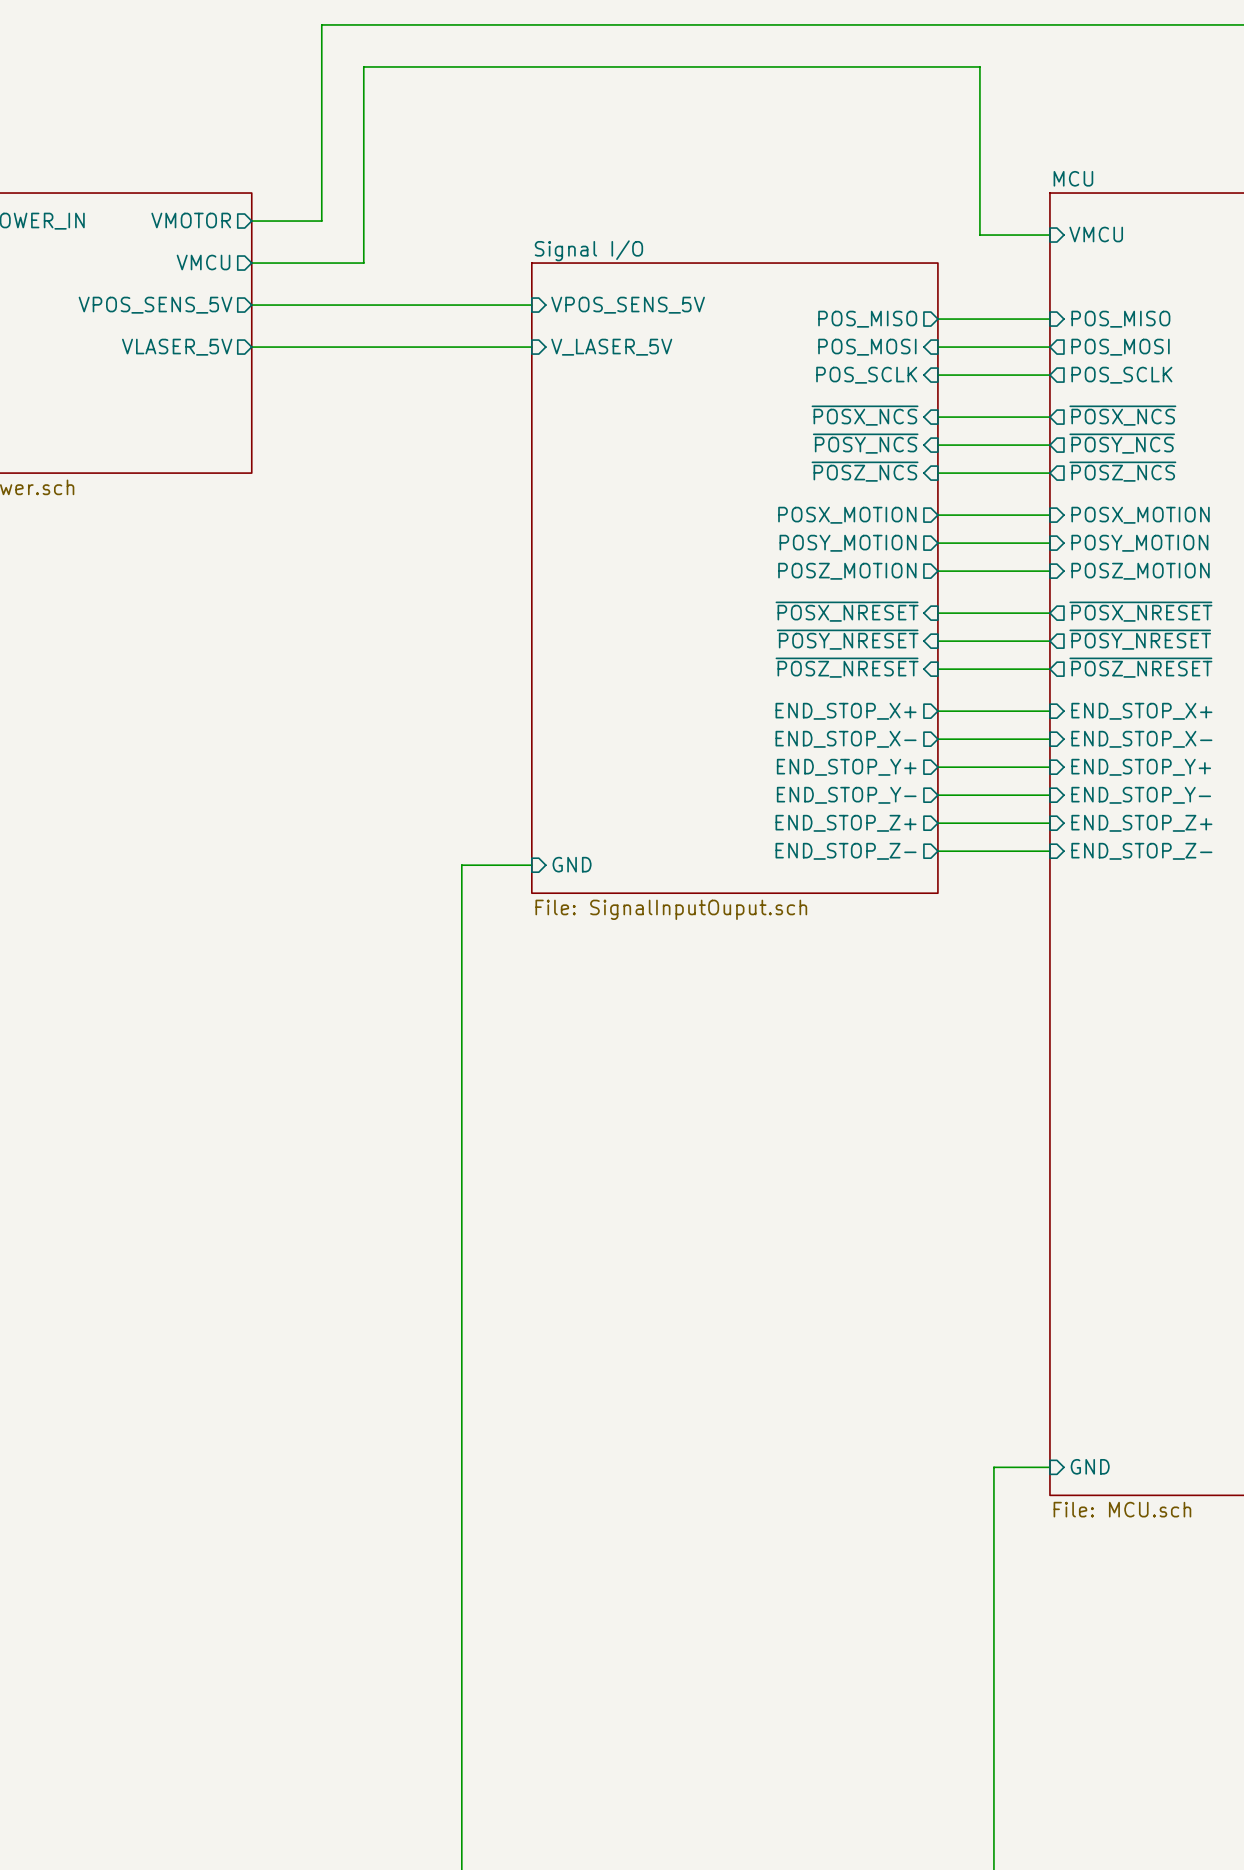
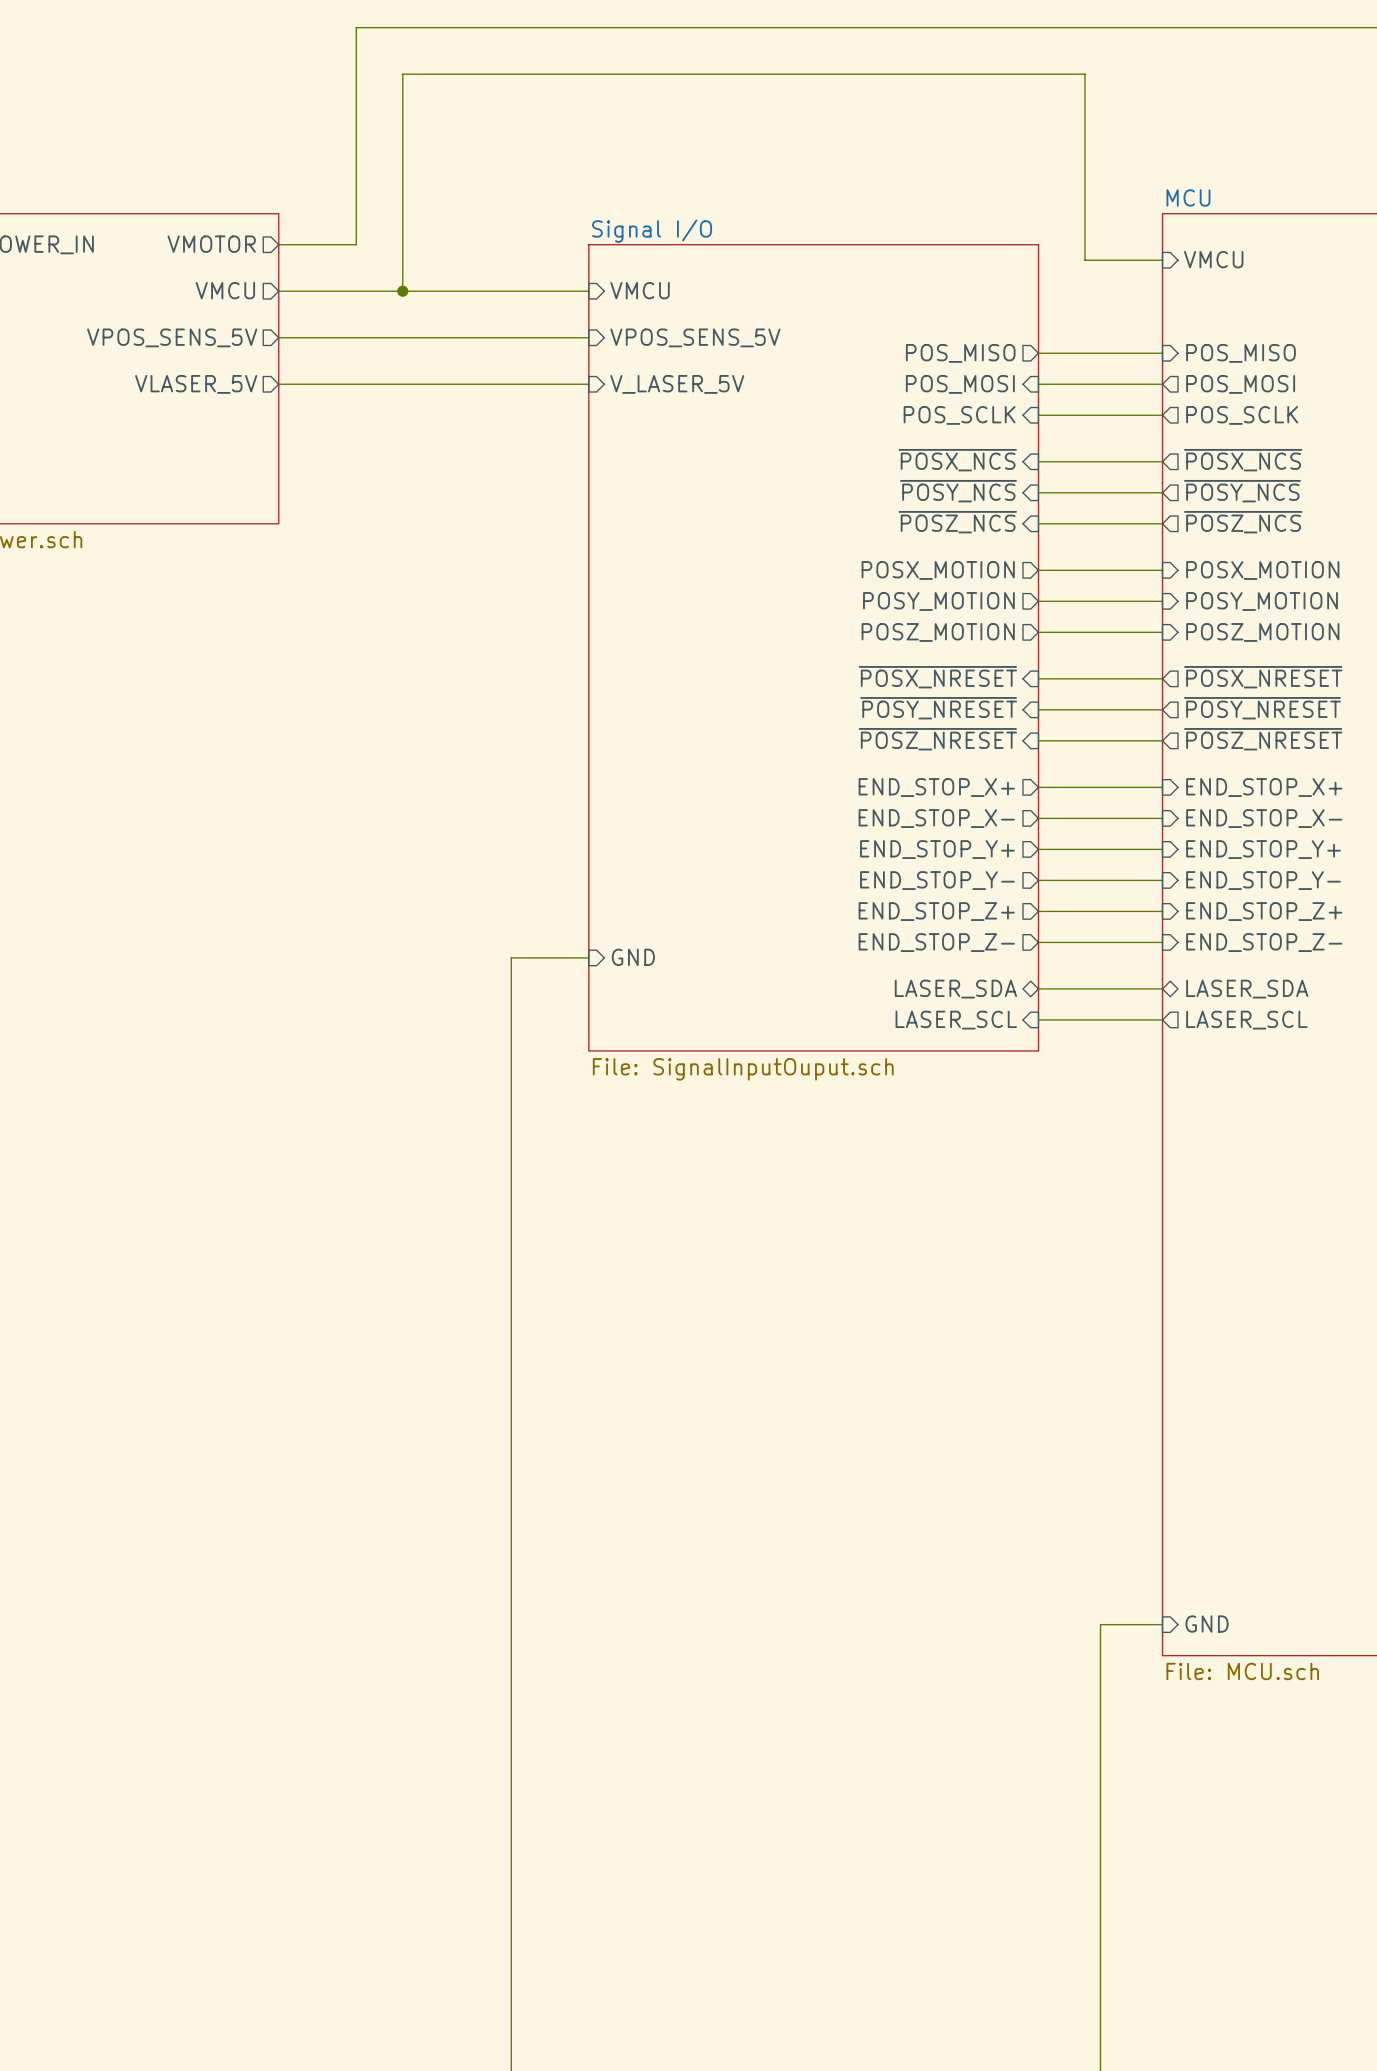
sheet Signal I/O name position: Signal I/O (588, 250) -> Signal I/O (652, 231)
sheet pin: none -> VMCU (640, 290)
wire: none -> (402, 291) (588, 291)
junction: none -> (402, 291)
sheet Signal I/O shape: [531, 263, 938, 894] -> [588, 244, 1039, 1051]
sheet pin: none -> LASER_SDA (955, 989)
wire: none -> (1038, 988) (1162, 988)
sheet pin: none -> LASER_SDA (1247, 989)
sheet Signal I/O value position: File: SignalInputOuput.sch (671, 909) -> File: SignalInputOuput.sch (743, 1069)
sheet pin: none -> LASER_SCL (956, 1020)
wire: none -> (1038, 1019) (1162, 1019)
sheet pin: none -> LASER_SCL (1246, 1020)

